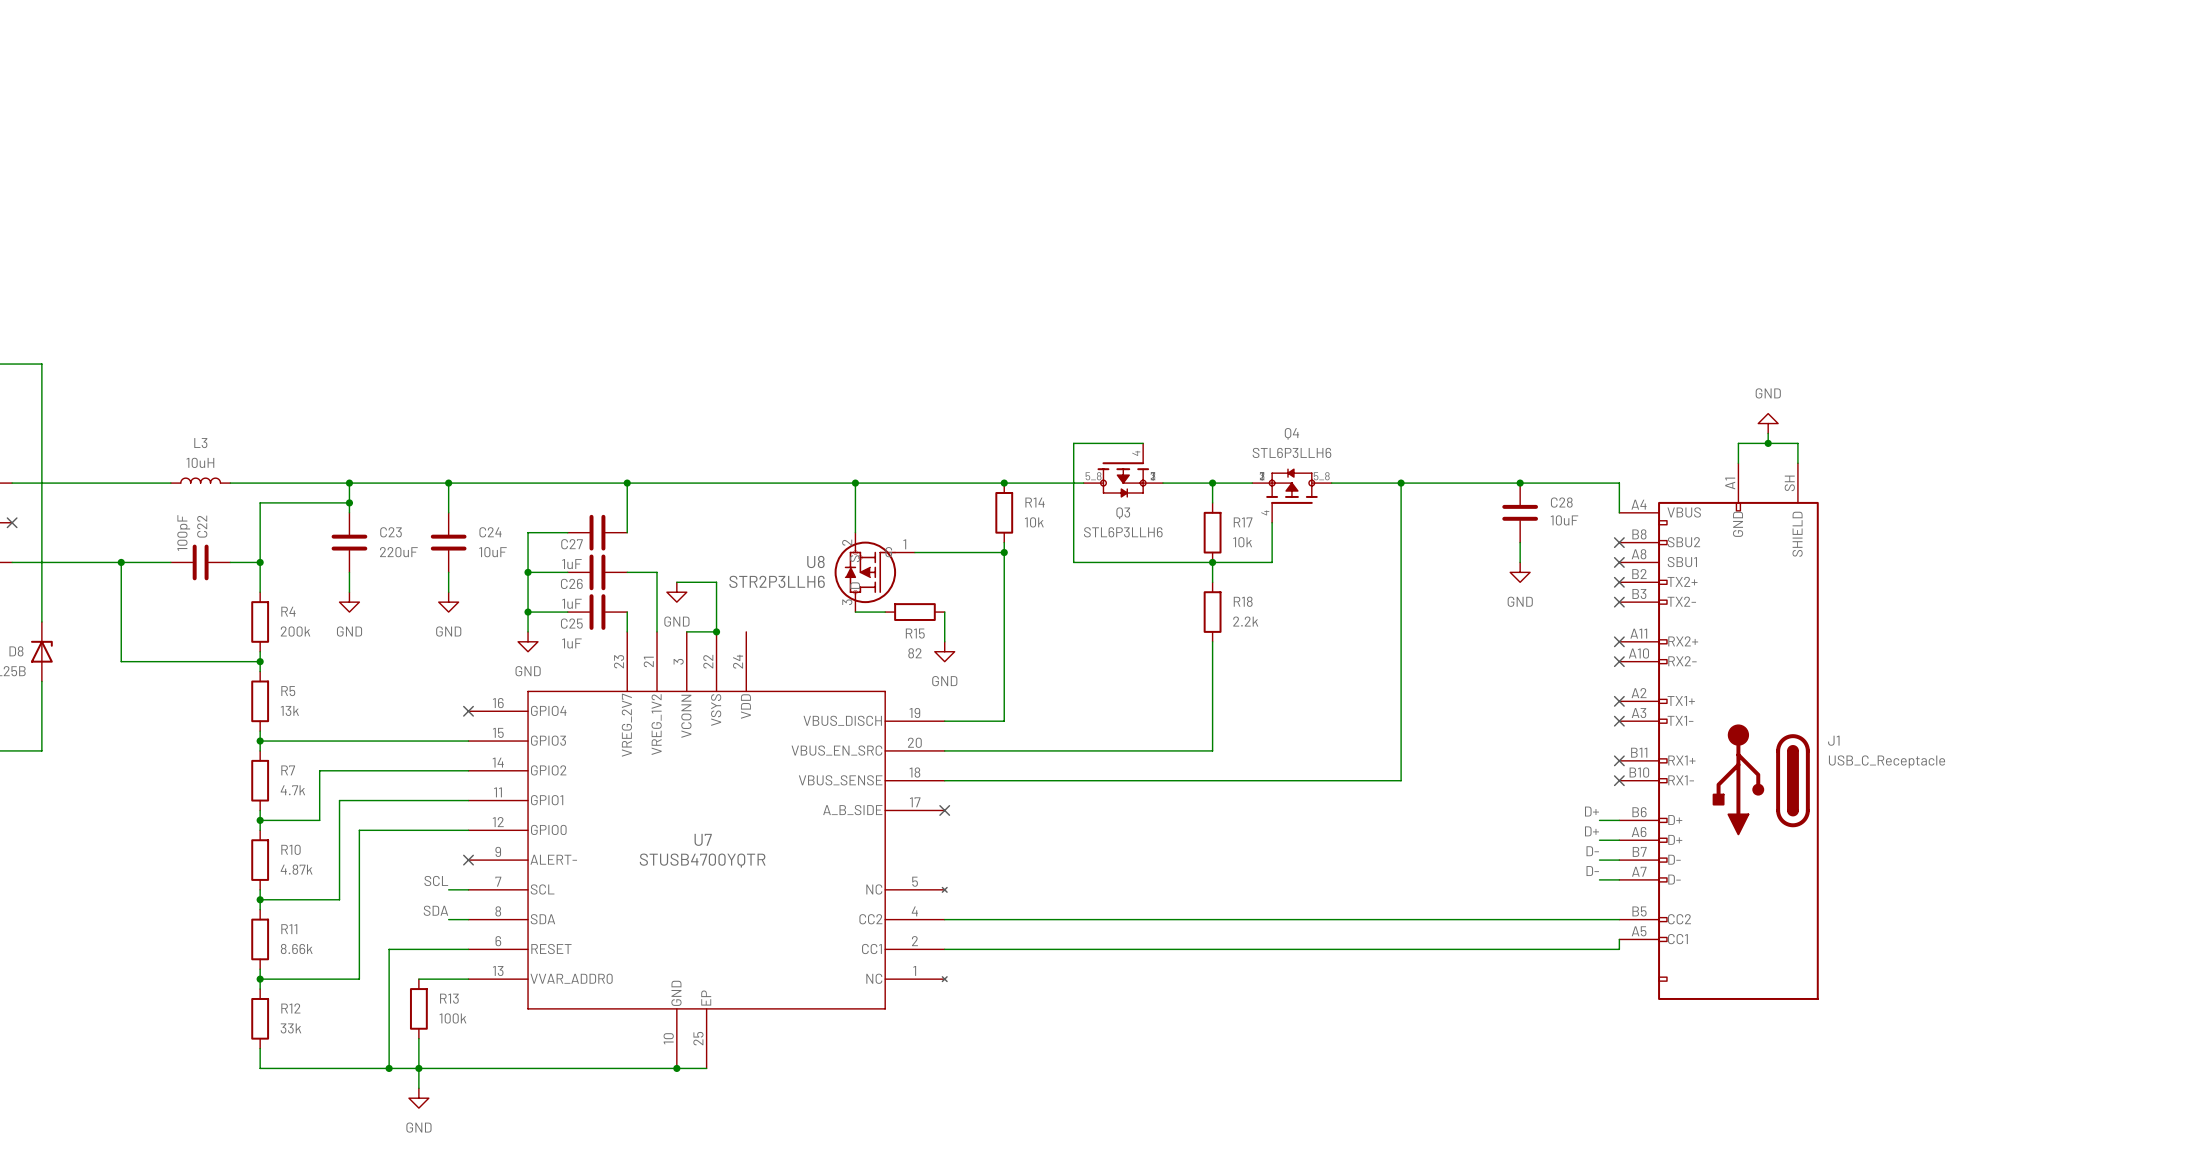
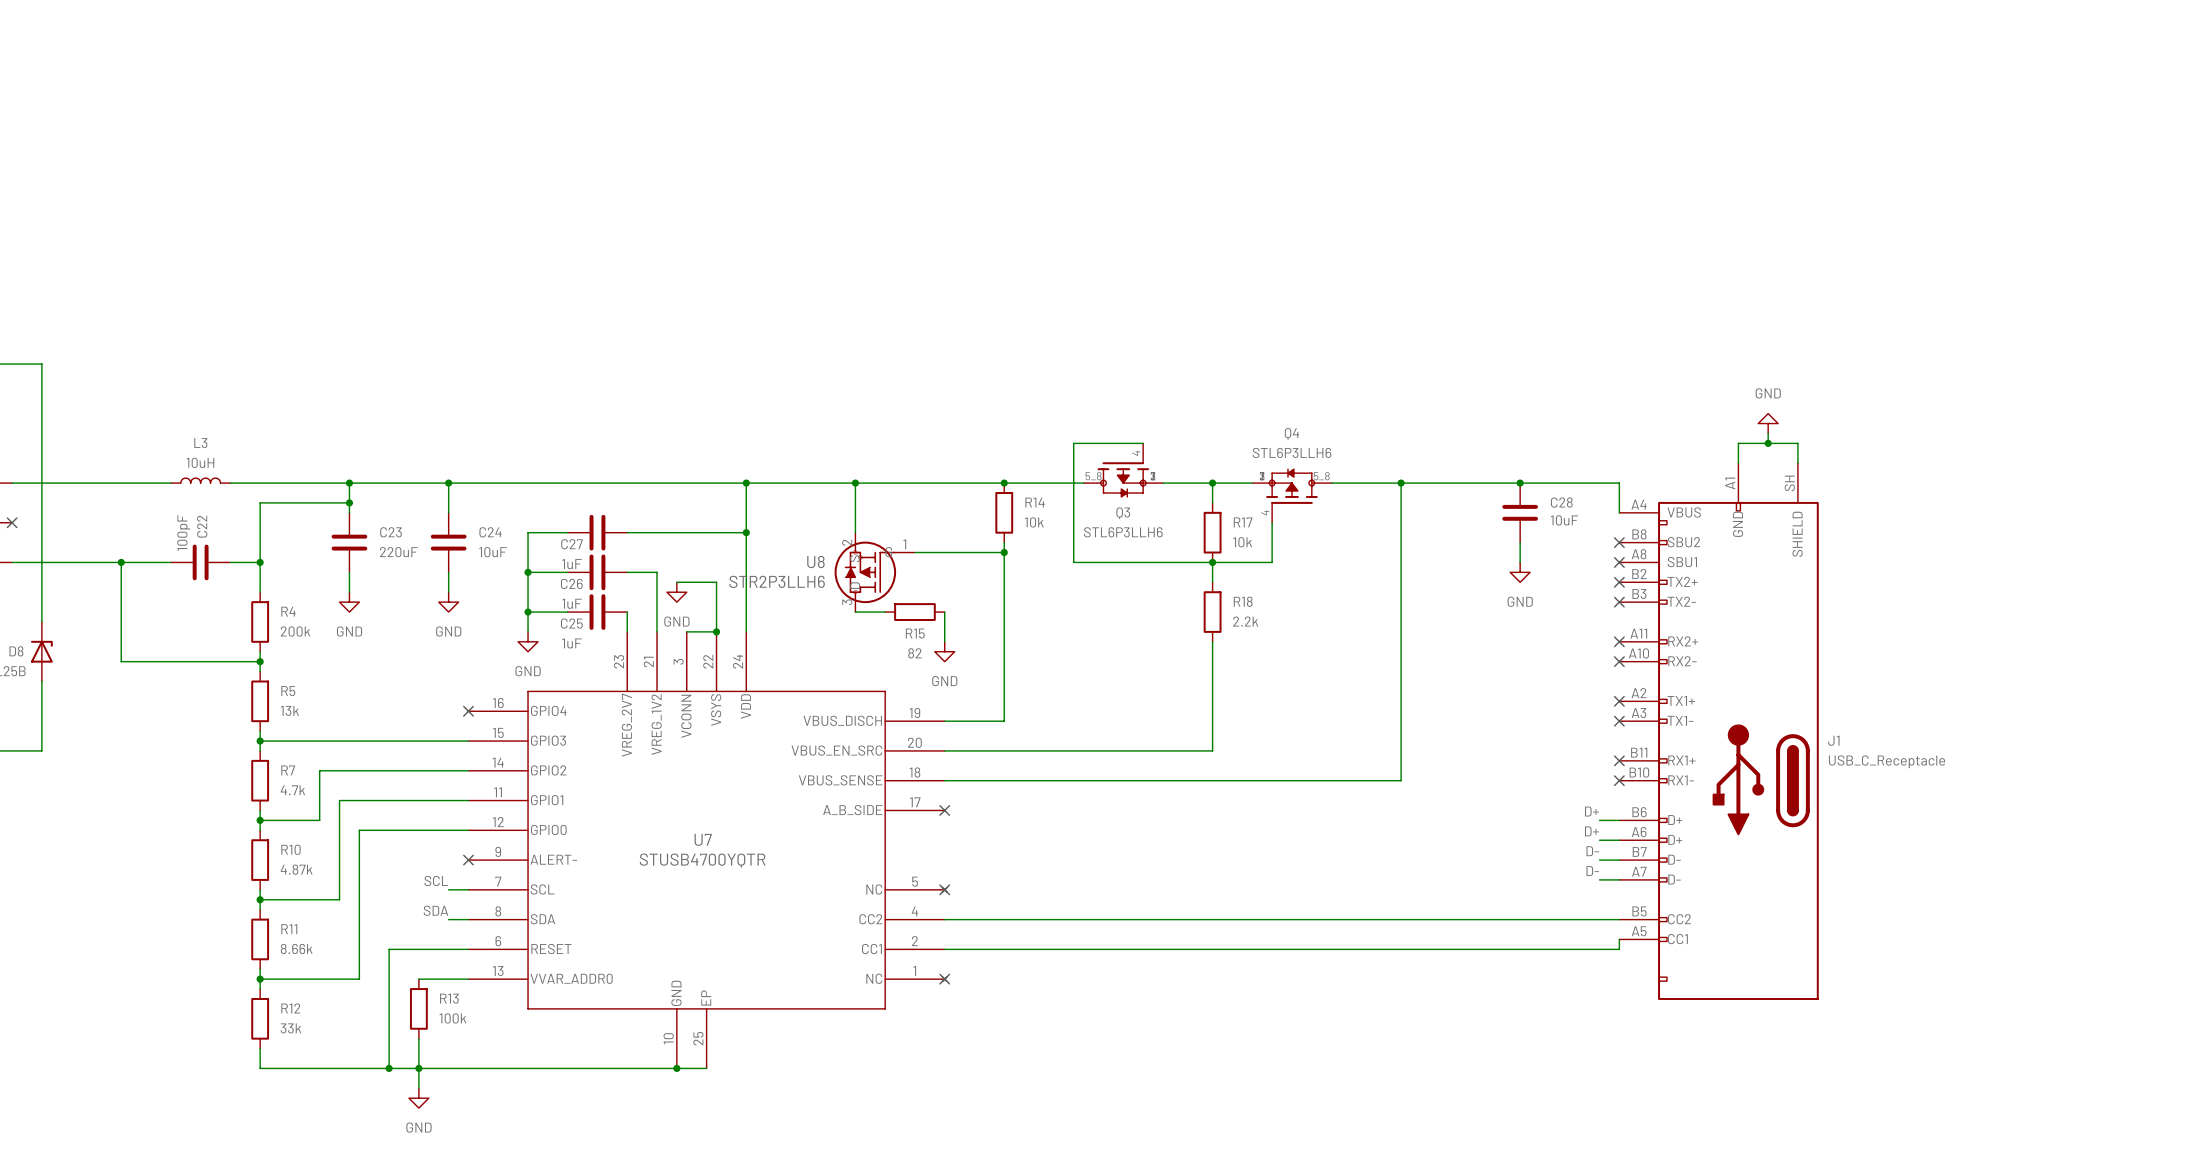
wire: (627, 483) (627, 532) -> (746, 532) (627, 532)
junction: (627, 483) -> none
wire: none -> (746, 483) (746, 631)
junction: none -> (746, 483)
junction: none -> (746, 532)
no-connect mark: none -> (944, 889)
no-connect mark: none -> (944, 979)

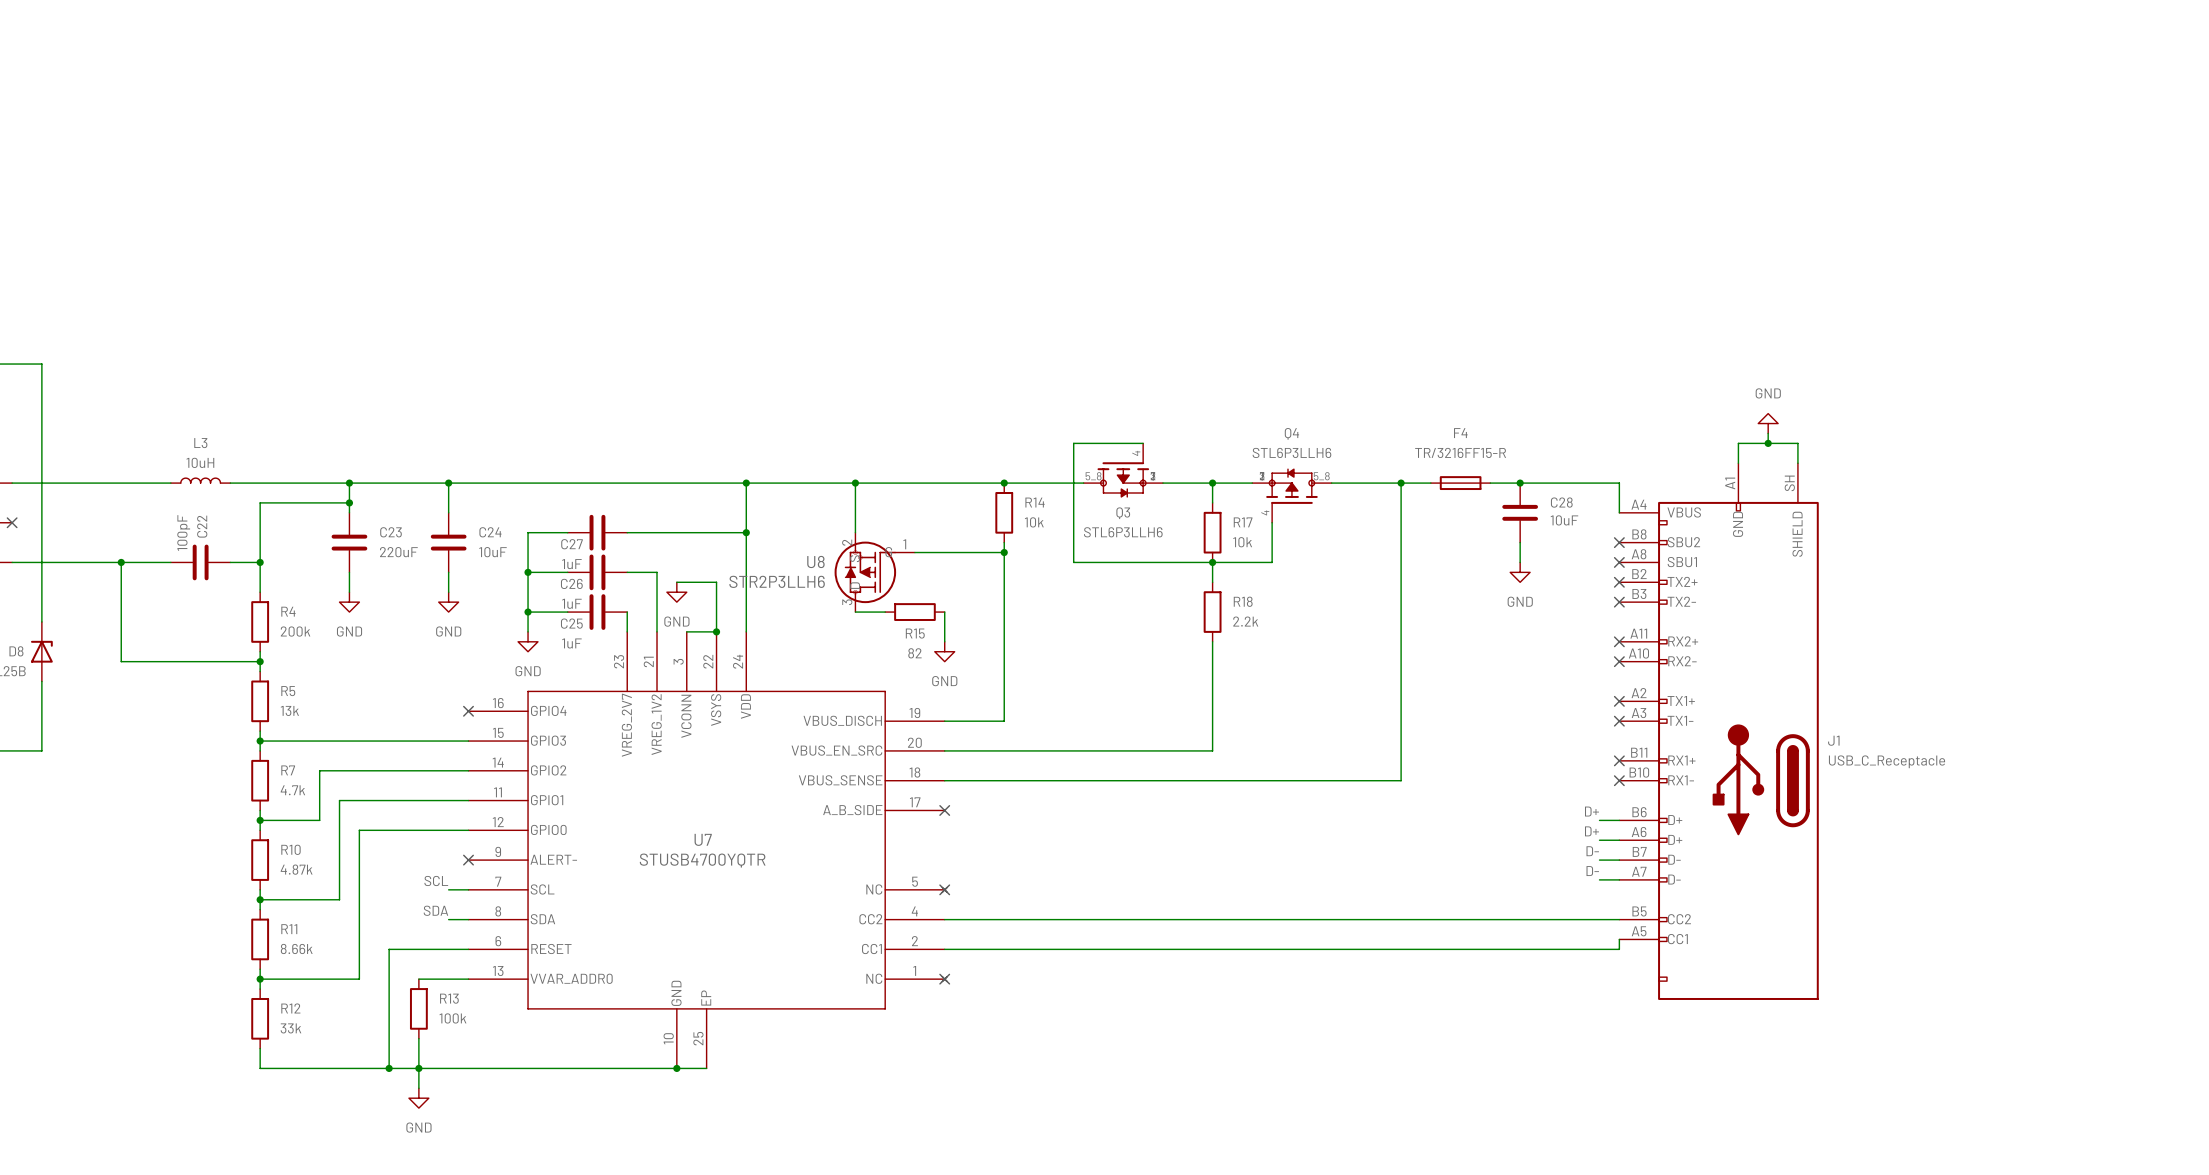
F4: none -> TR/3216FF15-R (1460, 483)

